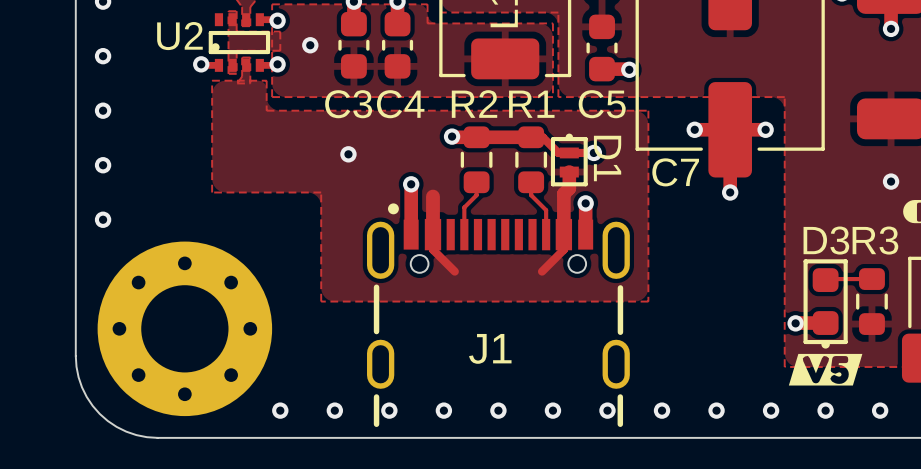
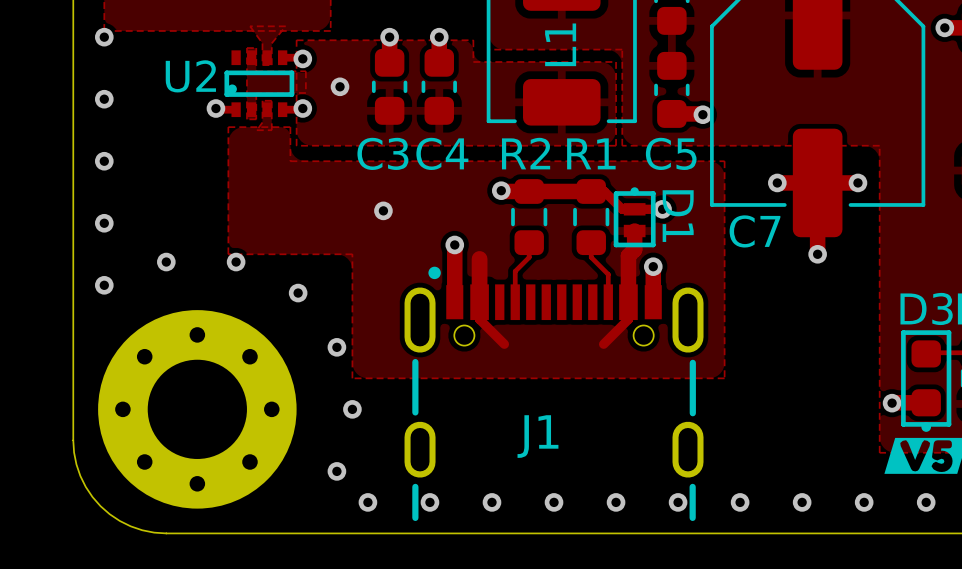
via: none -> (166, 262)
via: none -> (236, 262)
via: none -> (298, 293)
via: none -> (336, 347)
via: none -> (352, 409)
via position: (280, 410) -> (336, 471)

